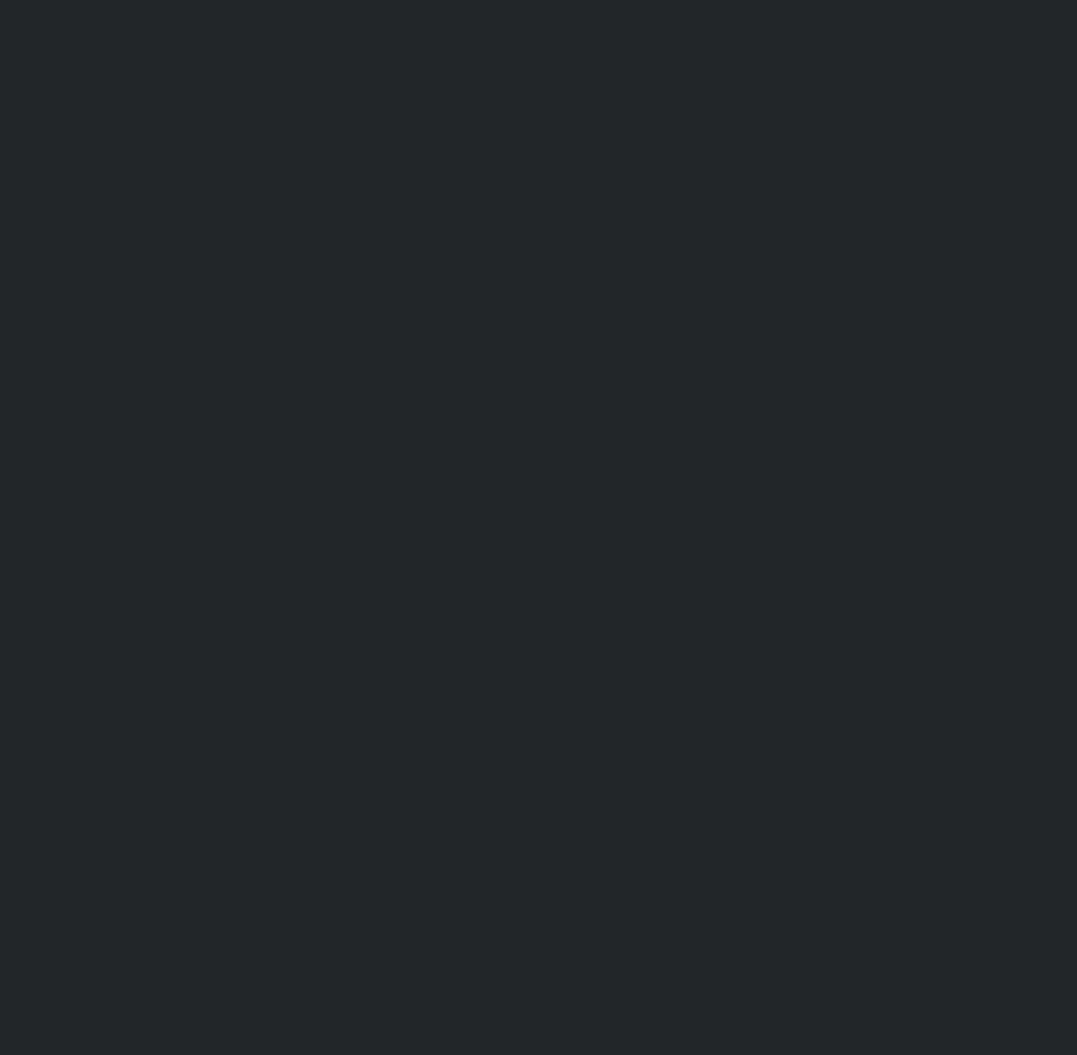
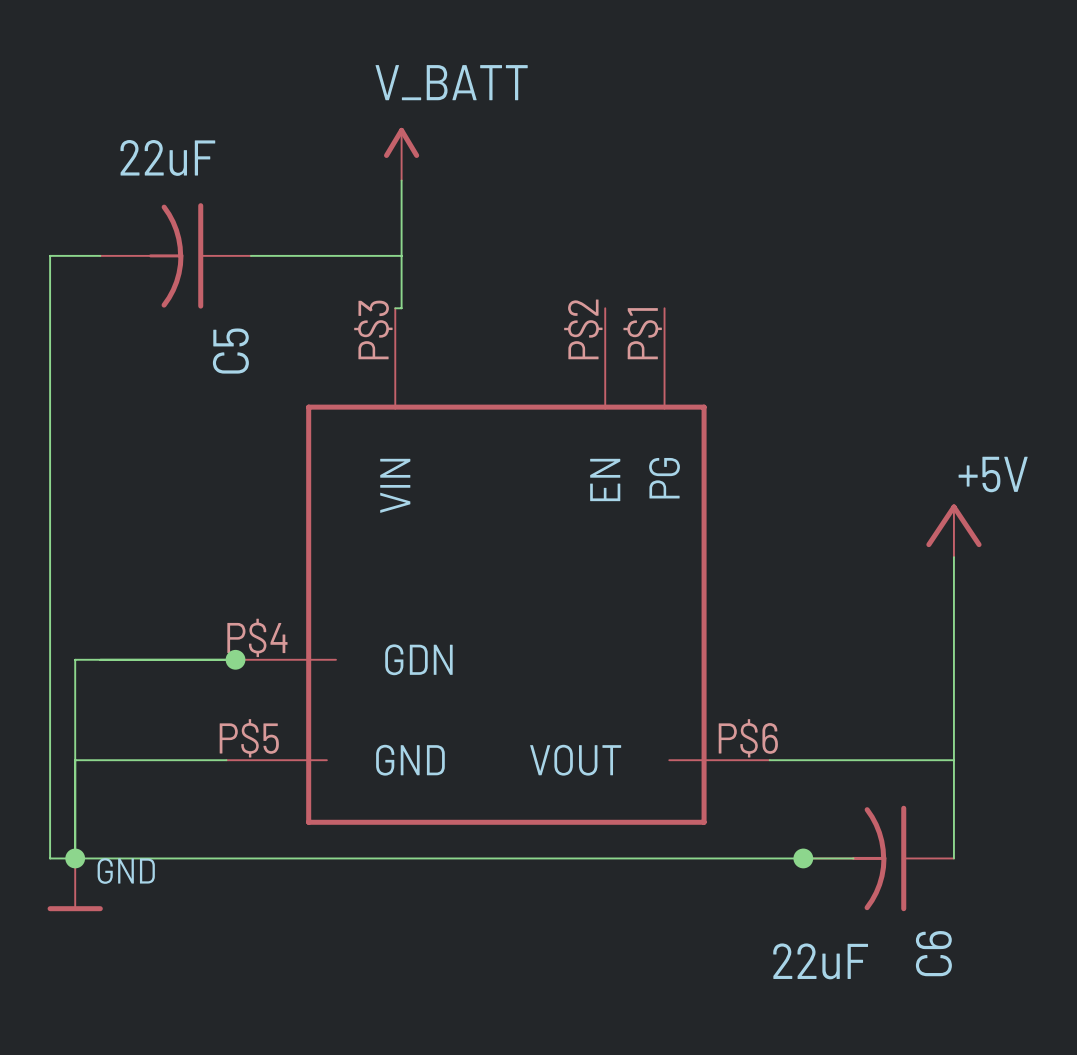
power symbol: none -> V_BATT (401, 154)
wire: none -> (401, 180) (401, 308) (395, 308)
wire: none -> (100, 255) (50, 255) (50, 858) (853, 858)
C5: none -> 22uF (175, 255)
wire: none -> (250, 255) (401, 255)
power symbol: none -> +5V (953, 530)
wire: none -> (953, 557) (953, 858)
part: none -> (498, 566)
wire: none -> (235, 659) (75, 659) (75, 858)
junction: none -> (235, 659)
wire: none -> (75, 760) (226, 760)
wire: none -> (769, 760) (953, 760)
junction: none -> (75, 858)
junction: none -> (803, 858)
C6: none -> 22uF (878, 858)
power symbol: none -> GND (75, 884)

